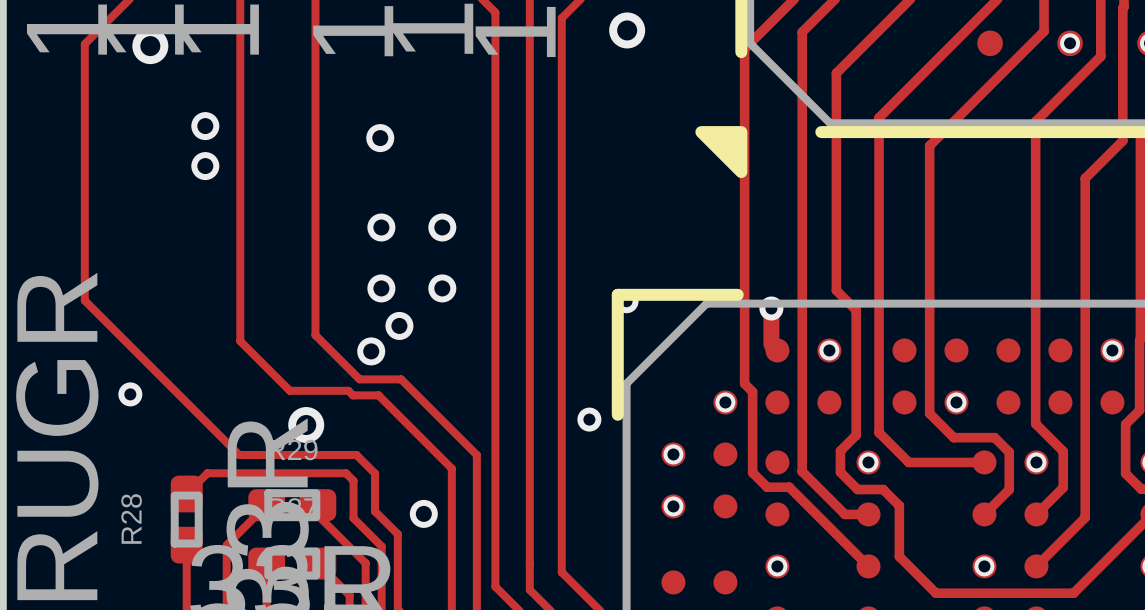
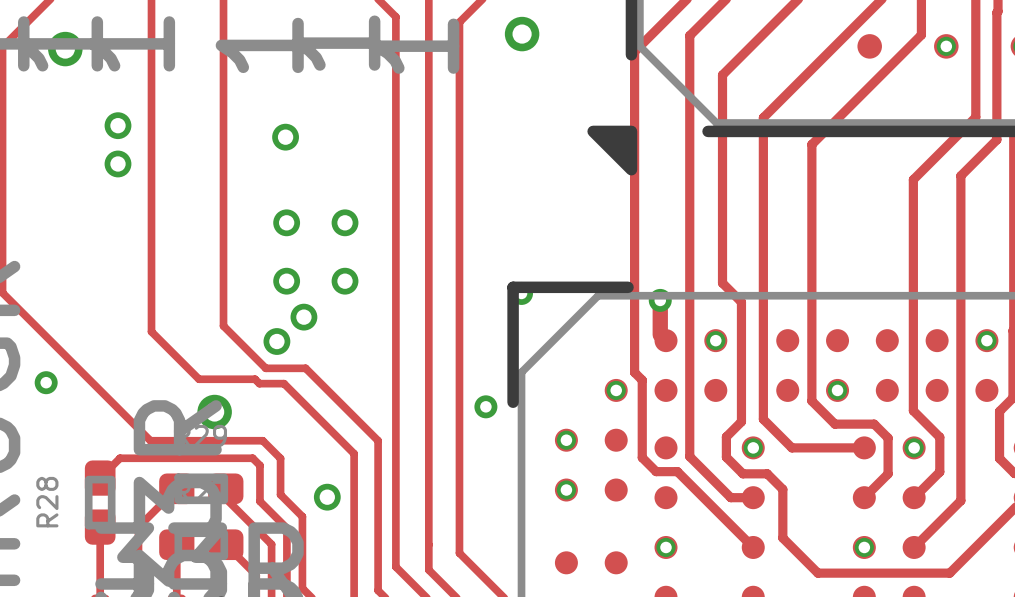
track: (1100, 56) (1035, 121) (1035, 182) -> (975, 58) (975, 117) (913, 179)

